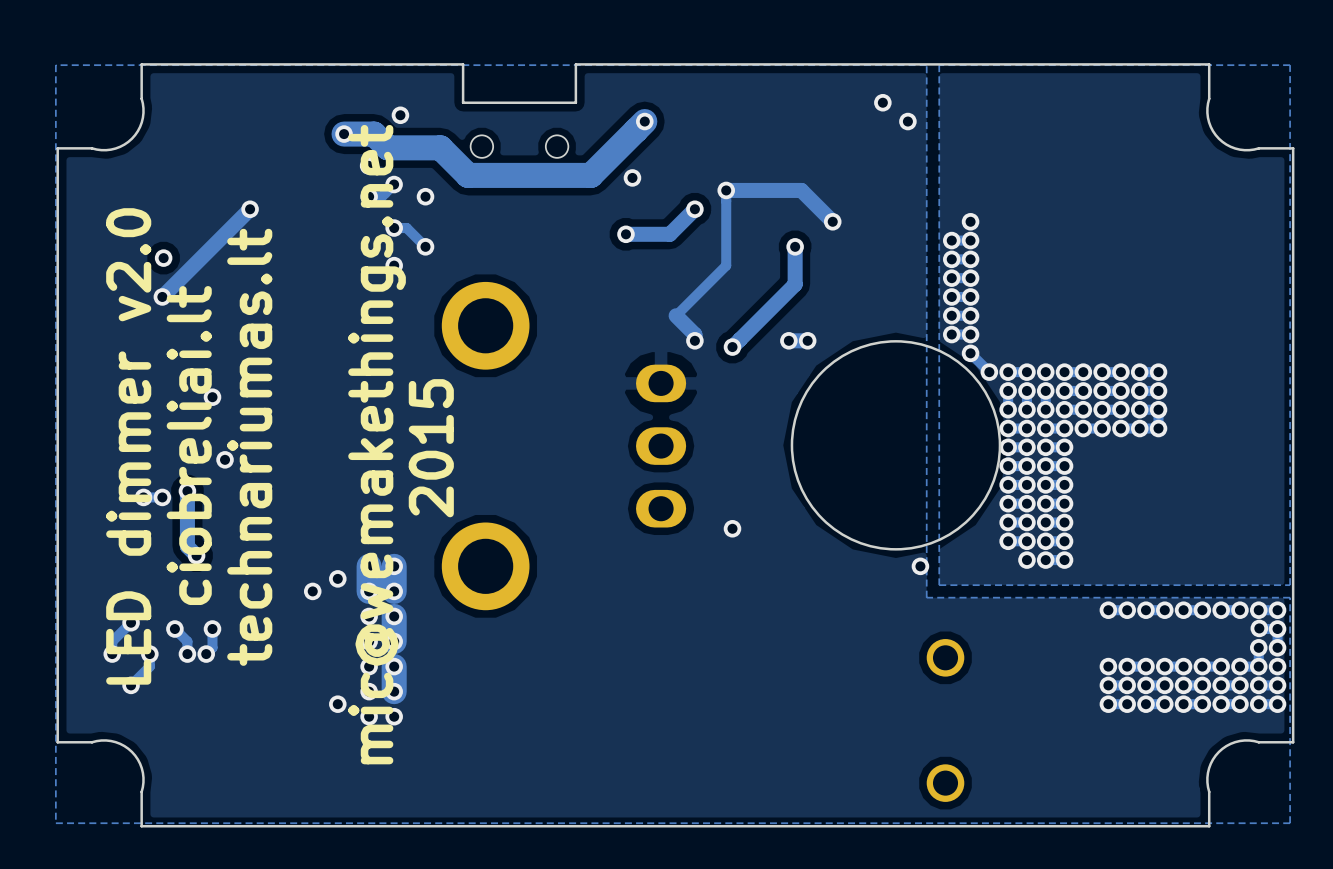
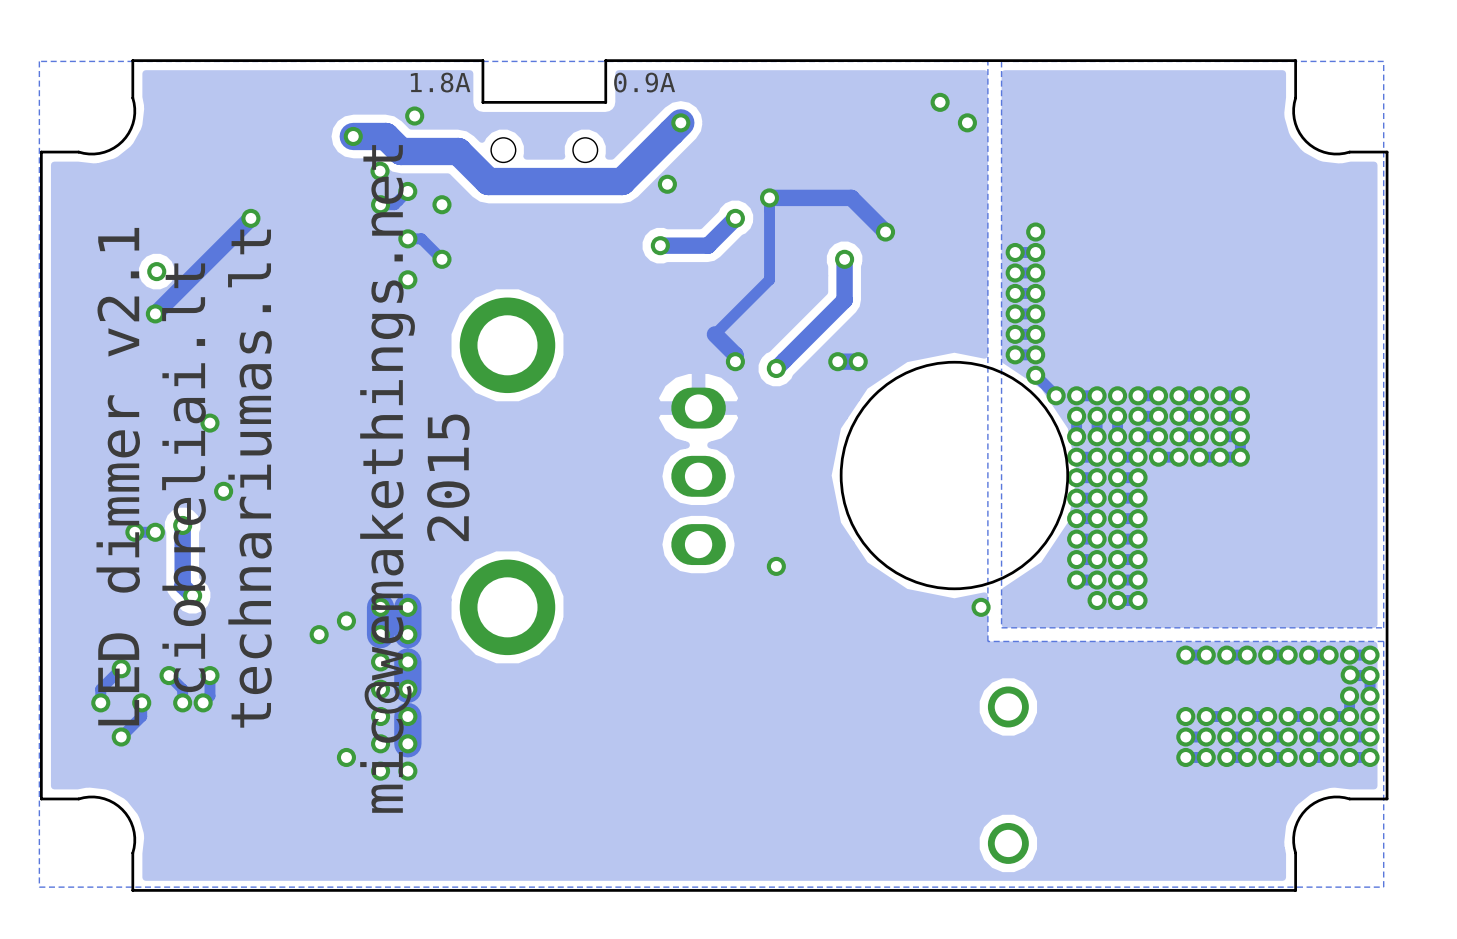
text: none -> 1.8A (440, 82)
text: none -> 0.9A (644, 82)
text: LED dimmer v2.0 (128, 446) -> LED dimmer v2.1 (118, 476)

